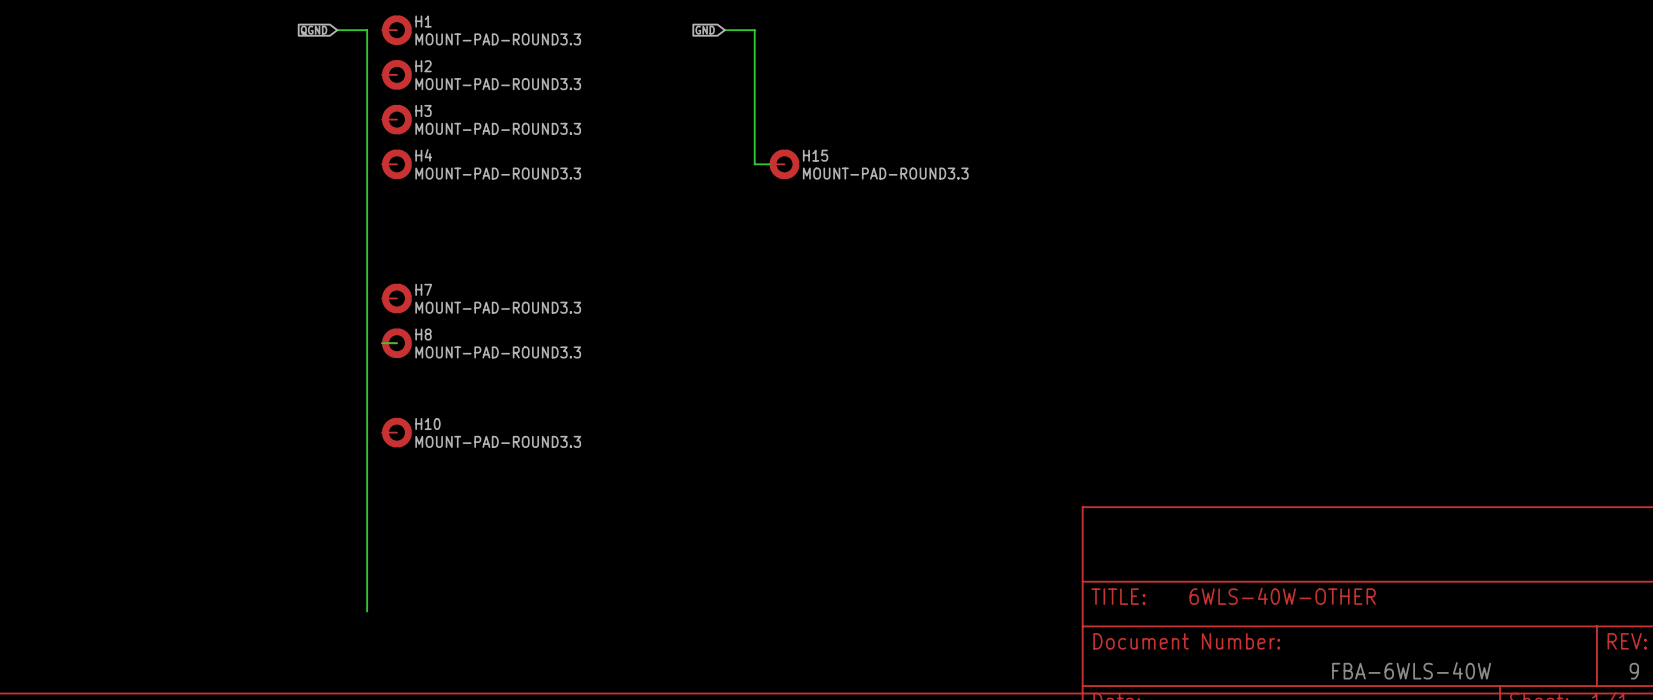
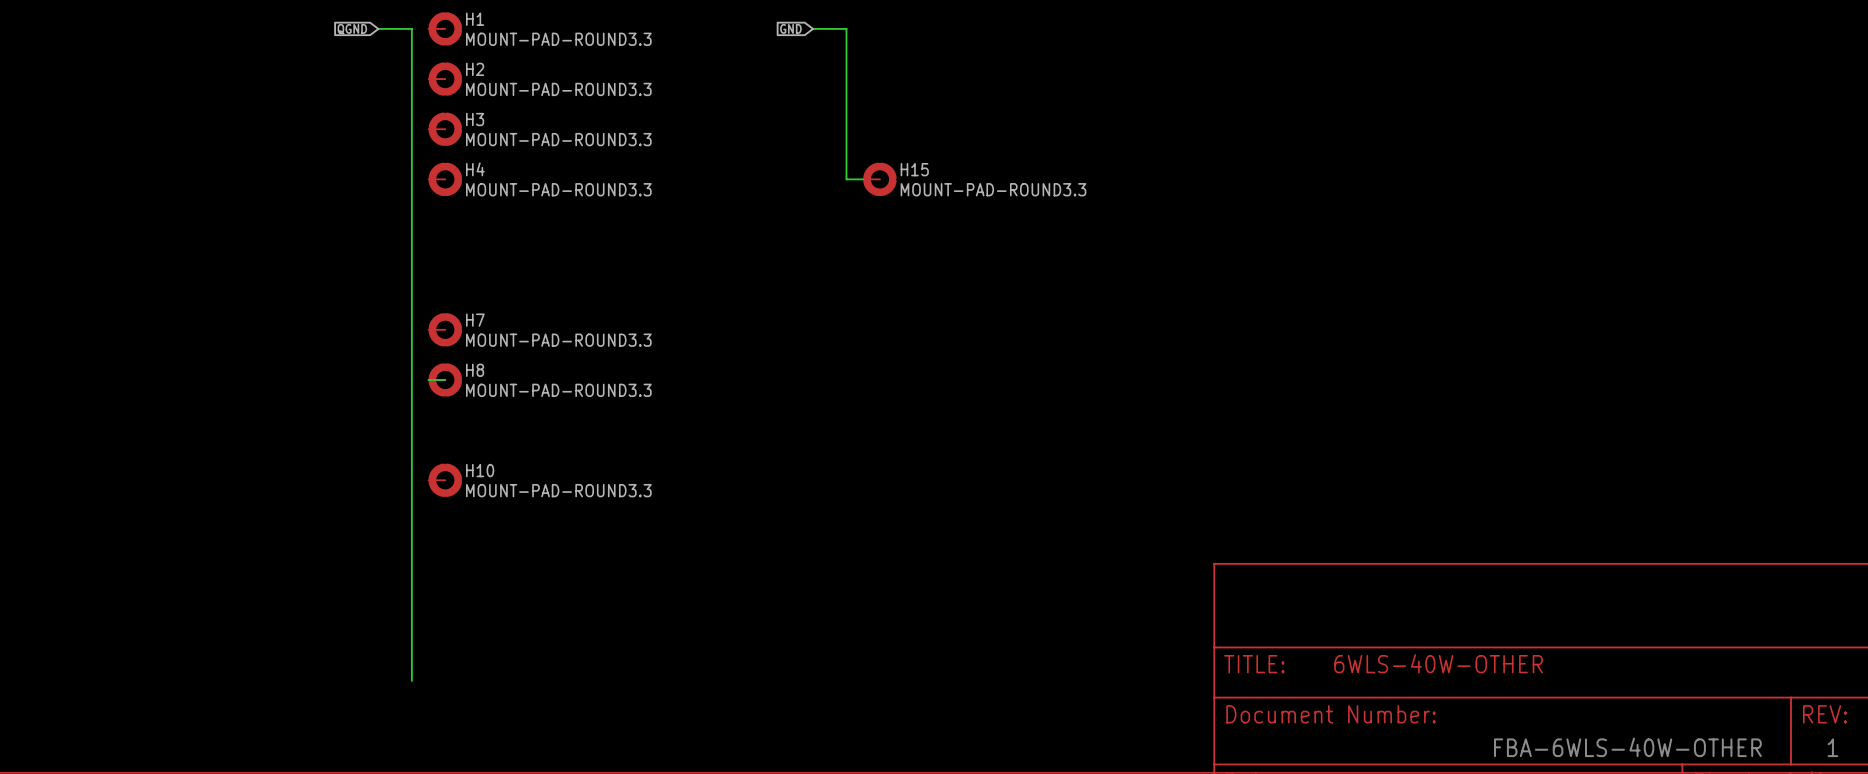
text: FBA-6WLS-40W (1411, 670) -> FBA-6WLS-40W-OTHER (1627, 747)
text: 9 (1634, 671) -> 1 (1832, 747)

